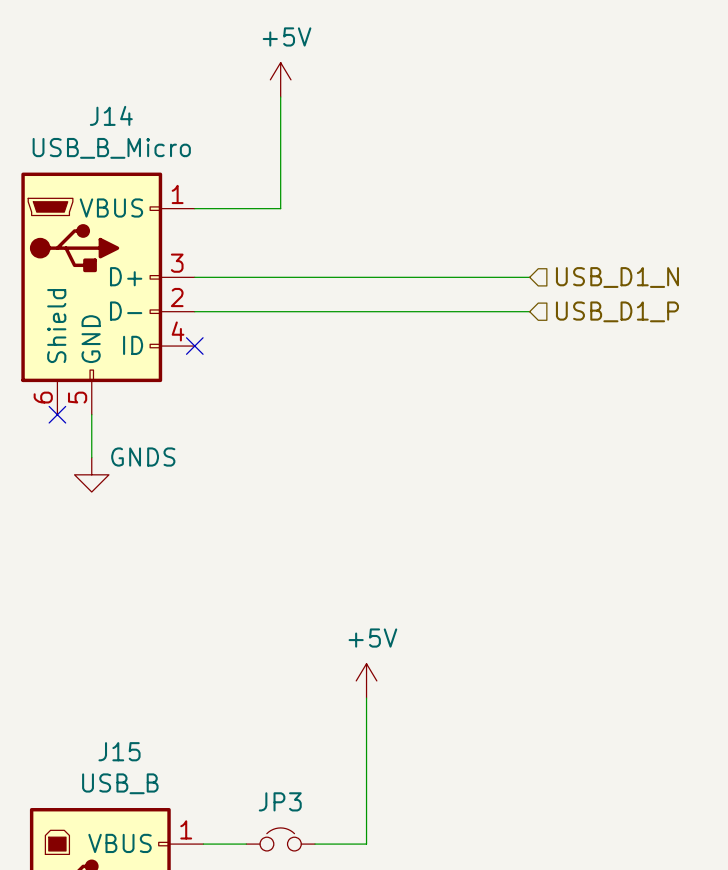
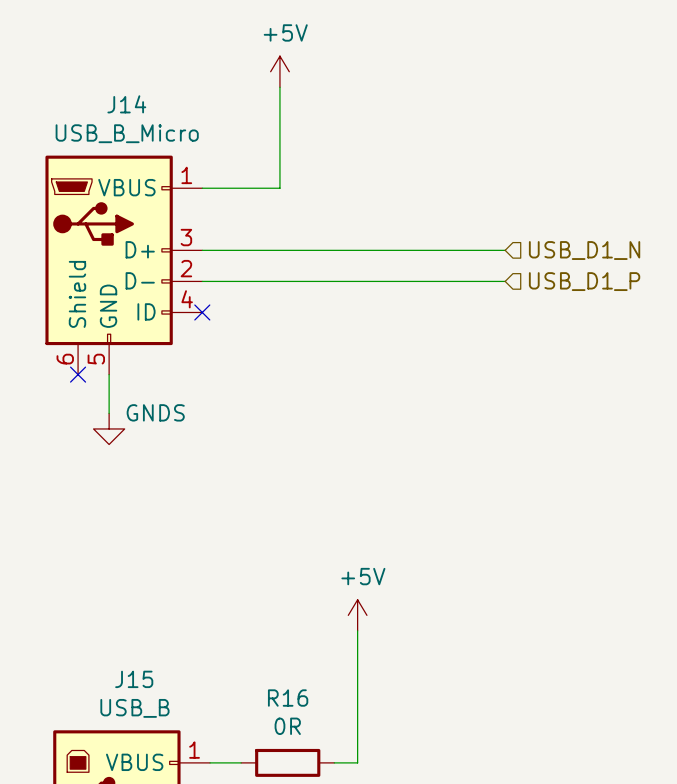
JP3: (280, 839) -> none
R16: none -> 0R (287, 762)

